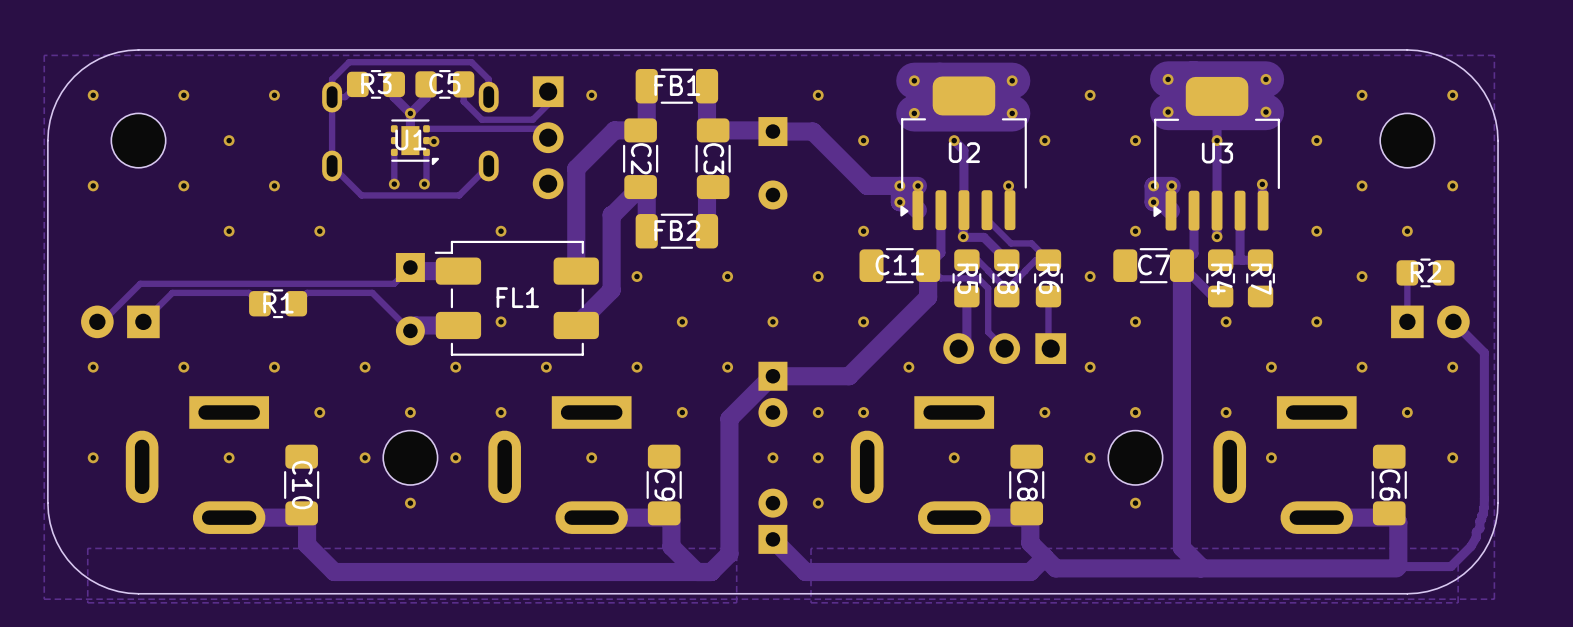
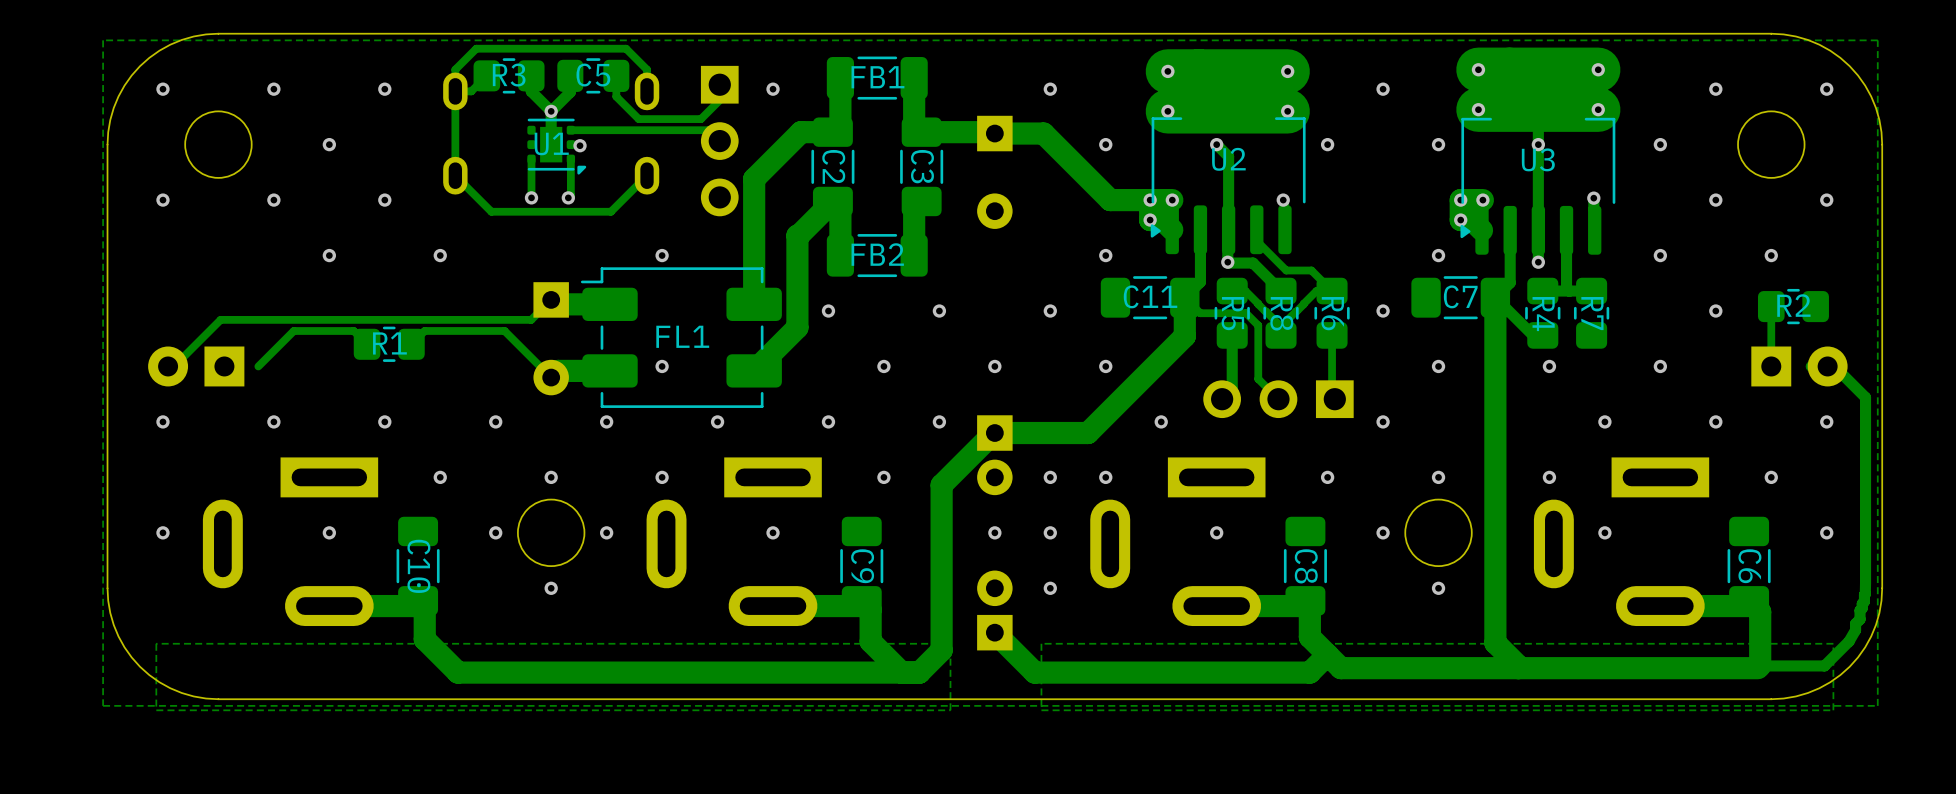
track: (200, 292) (172, 292) (143, 321) -> (293, 331) (258, 366)
track: (1453, 321) (1484, 352) -> (1811, 366) (1834, 366) (1865, 397) (1865, 404)

